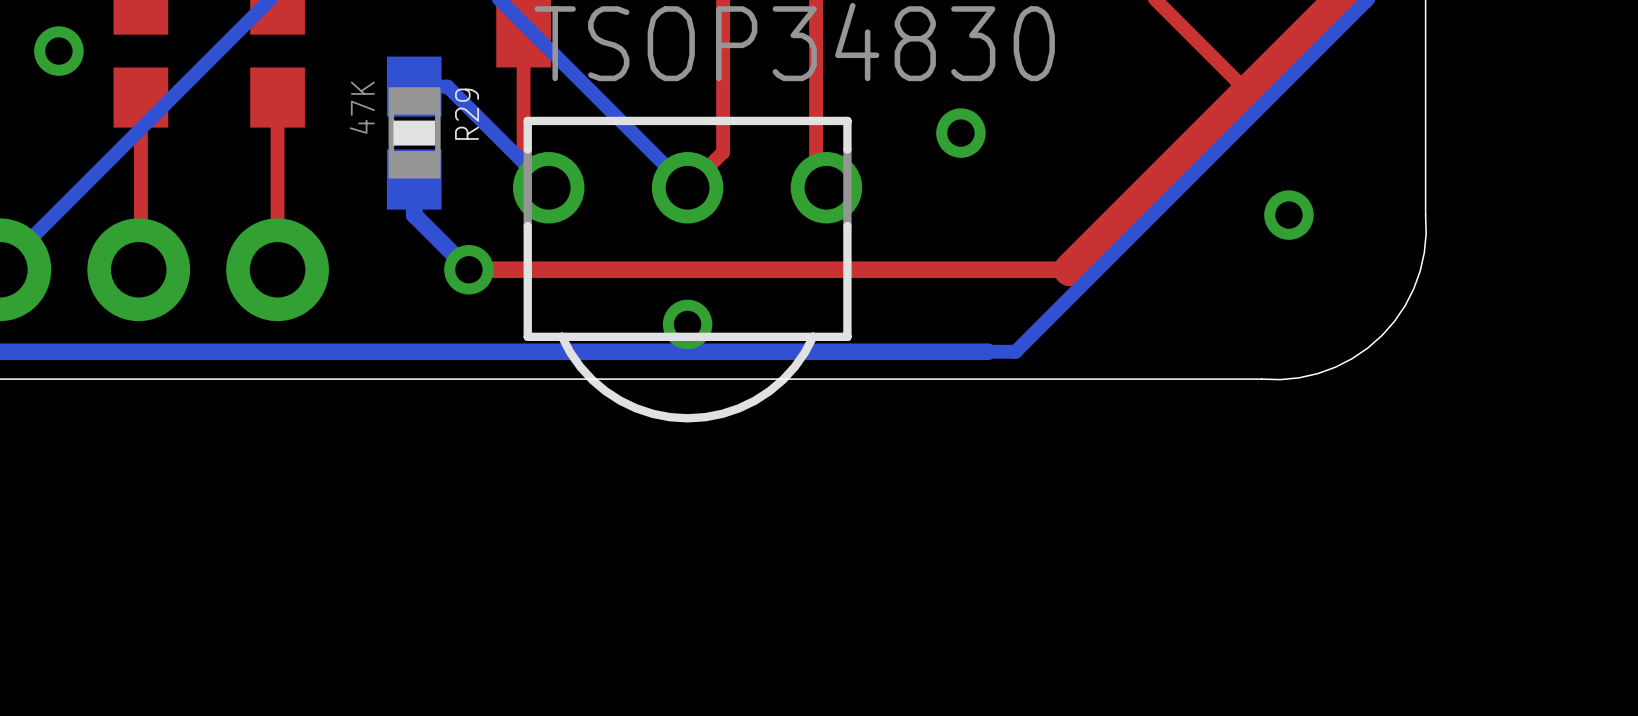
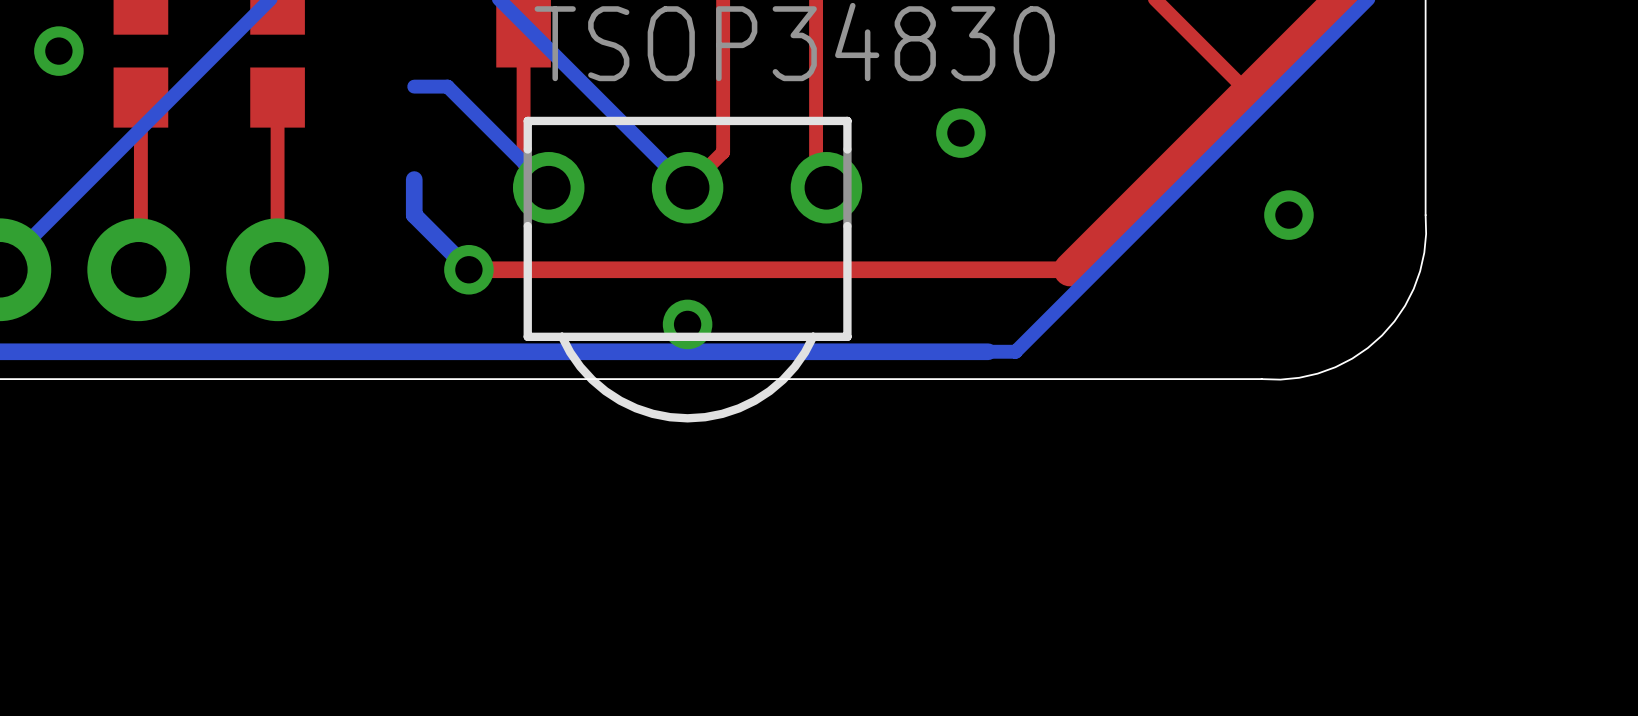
R29: 47K (414, 133) -> none

